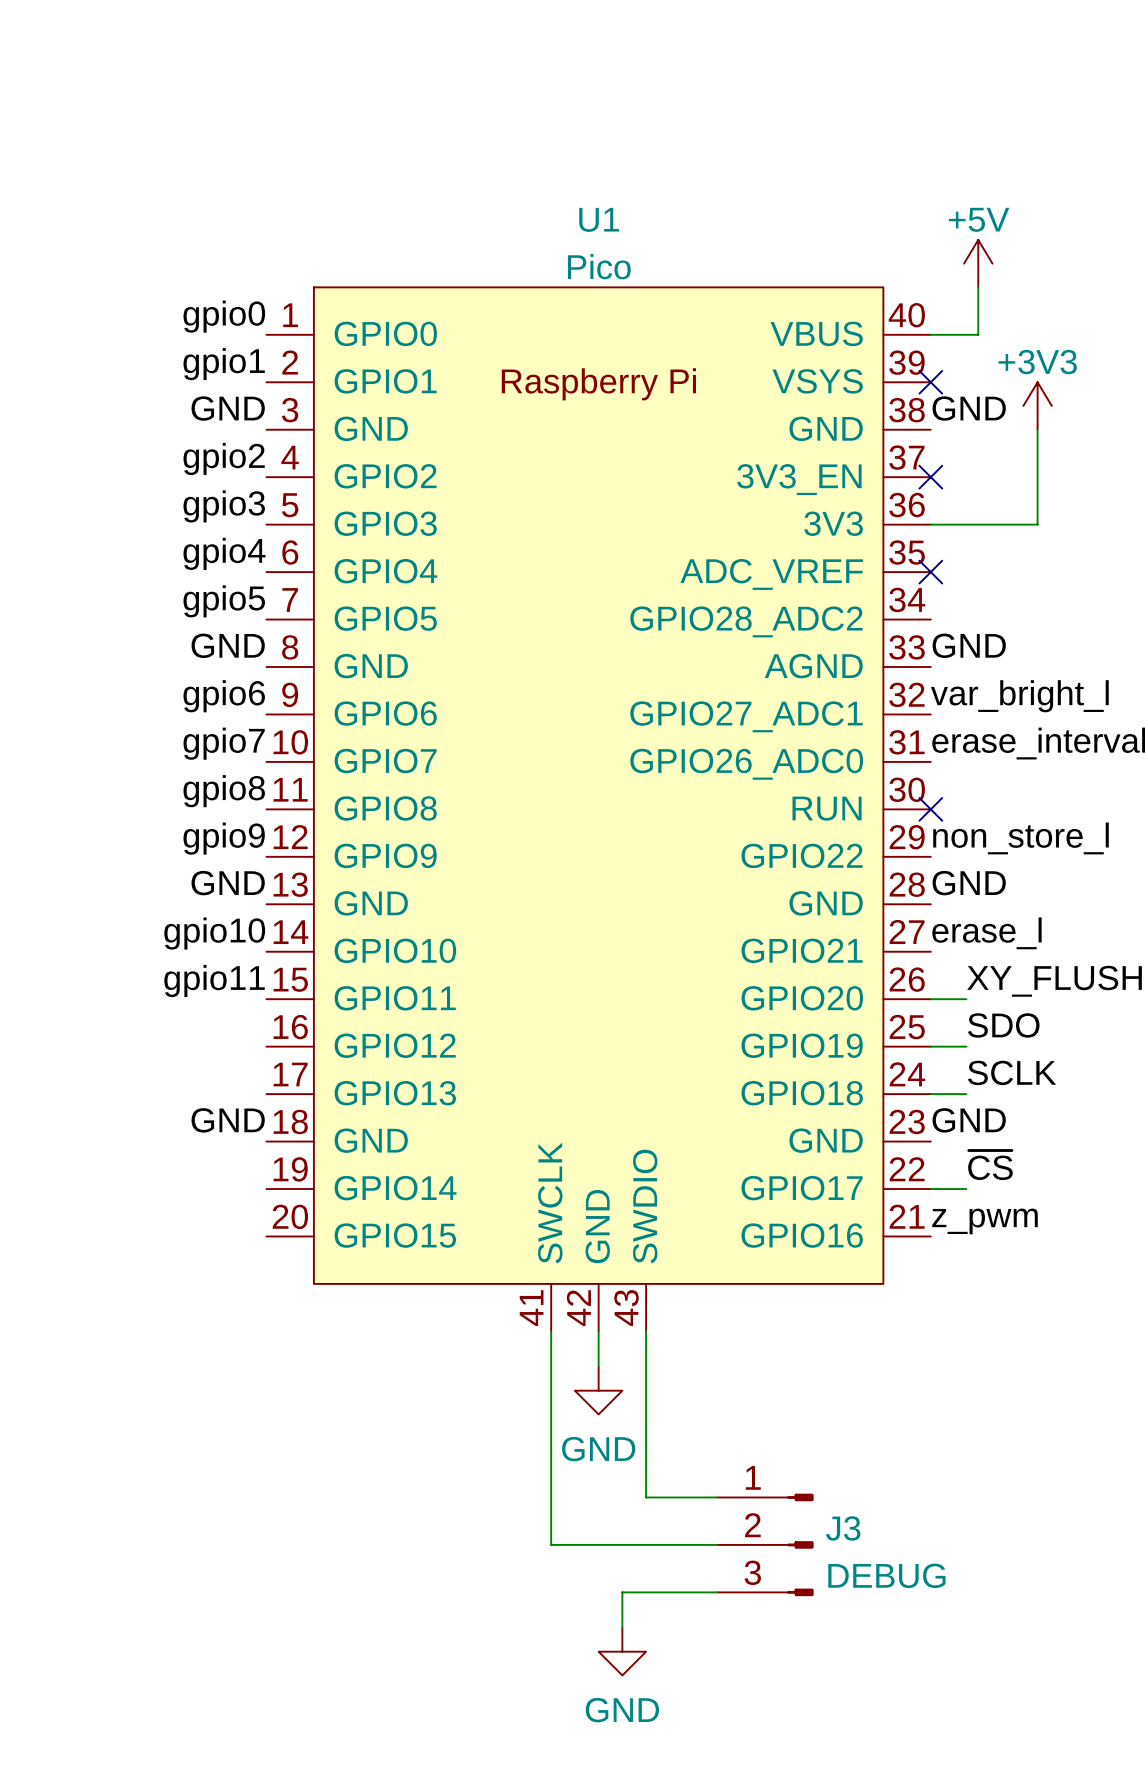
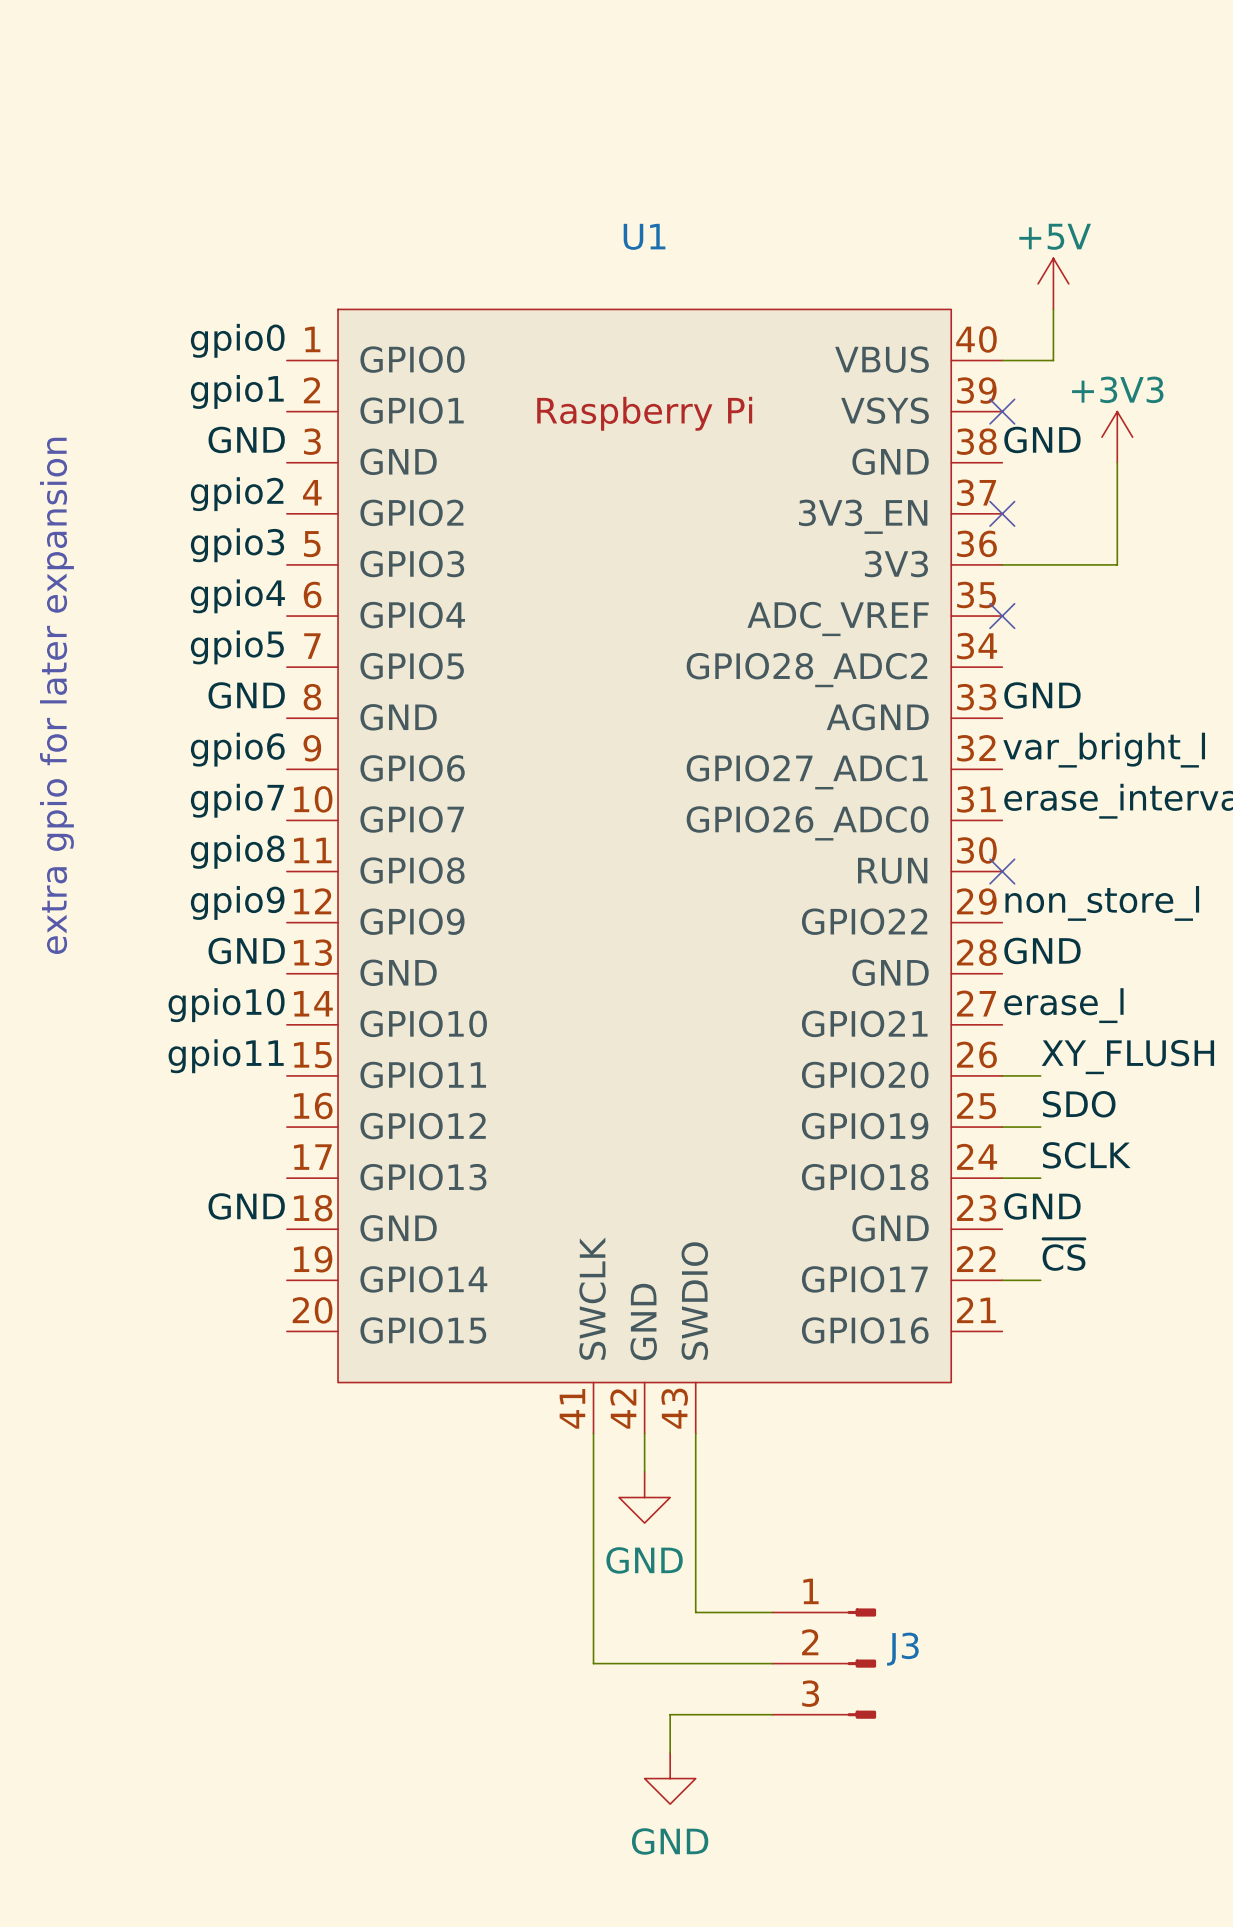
U1 value: Pico (599, 266) -> none
text: none -> extra gpio for later expansion (56, 695)
label: z_pwm (985, 1221) -> none
J3 value: DEBUG (886, 1575) -> none

